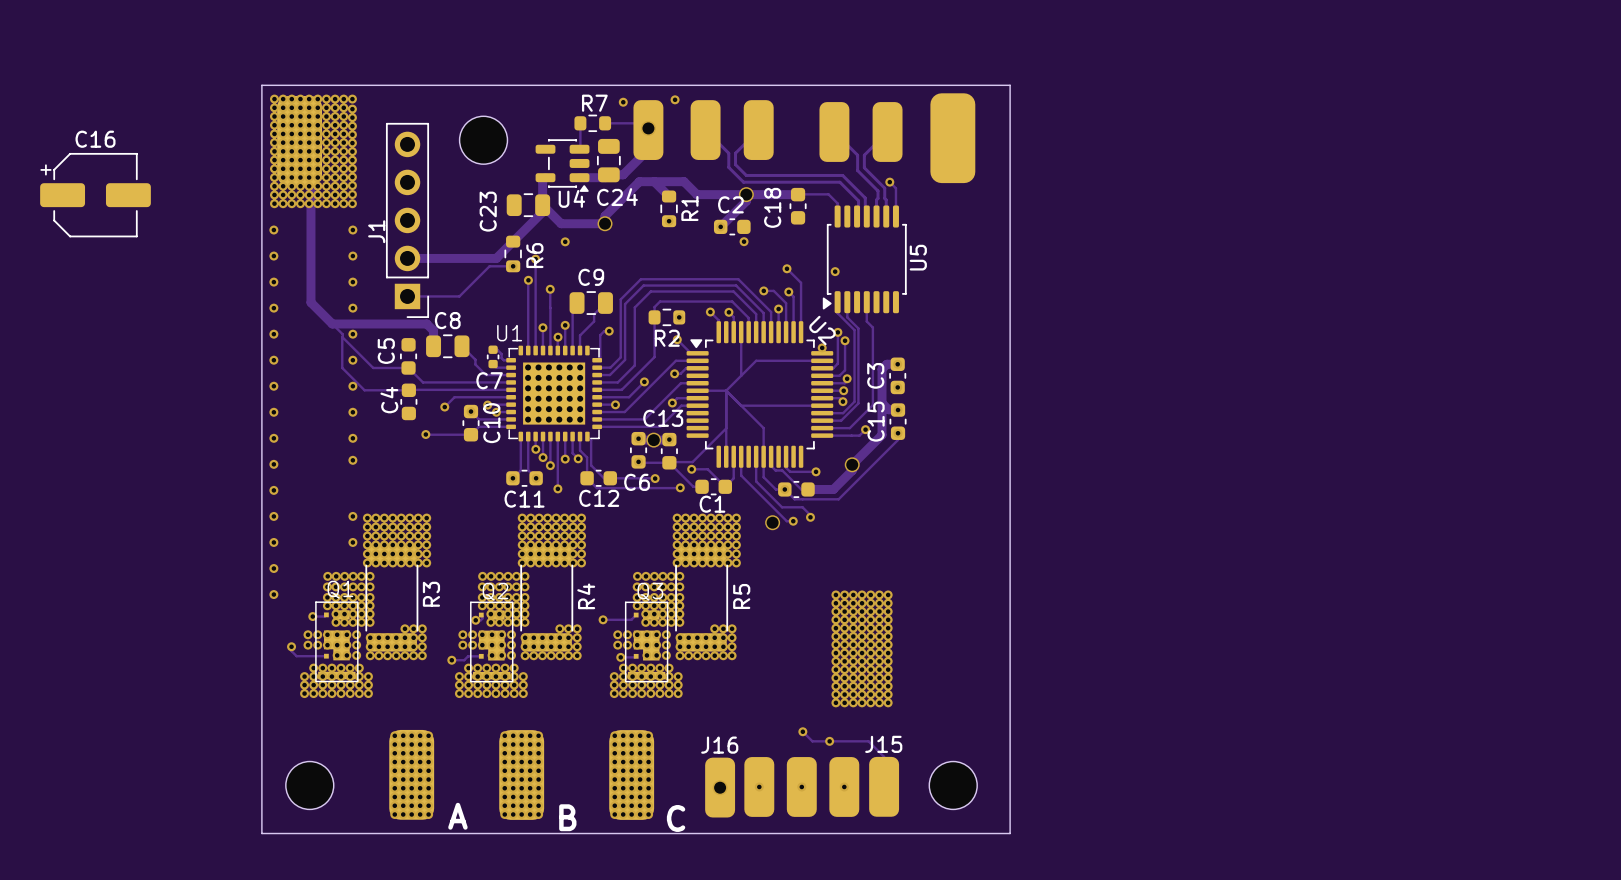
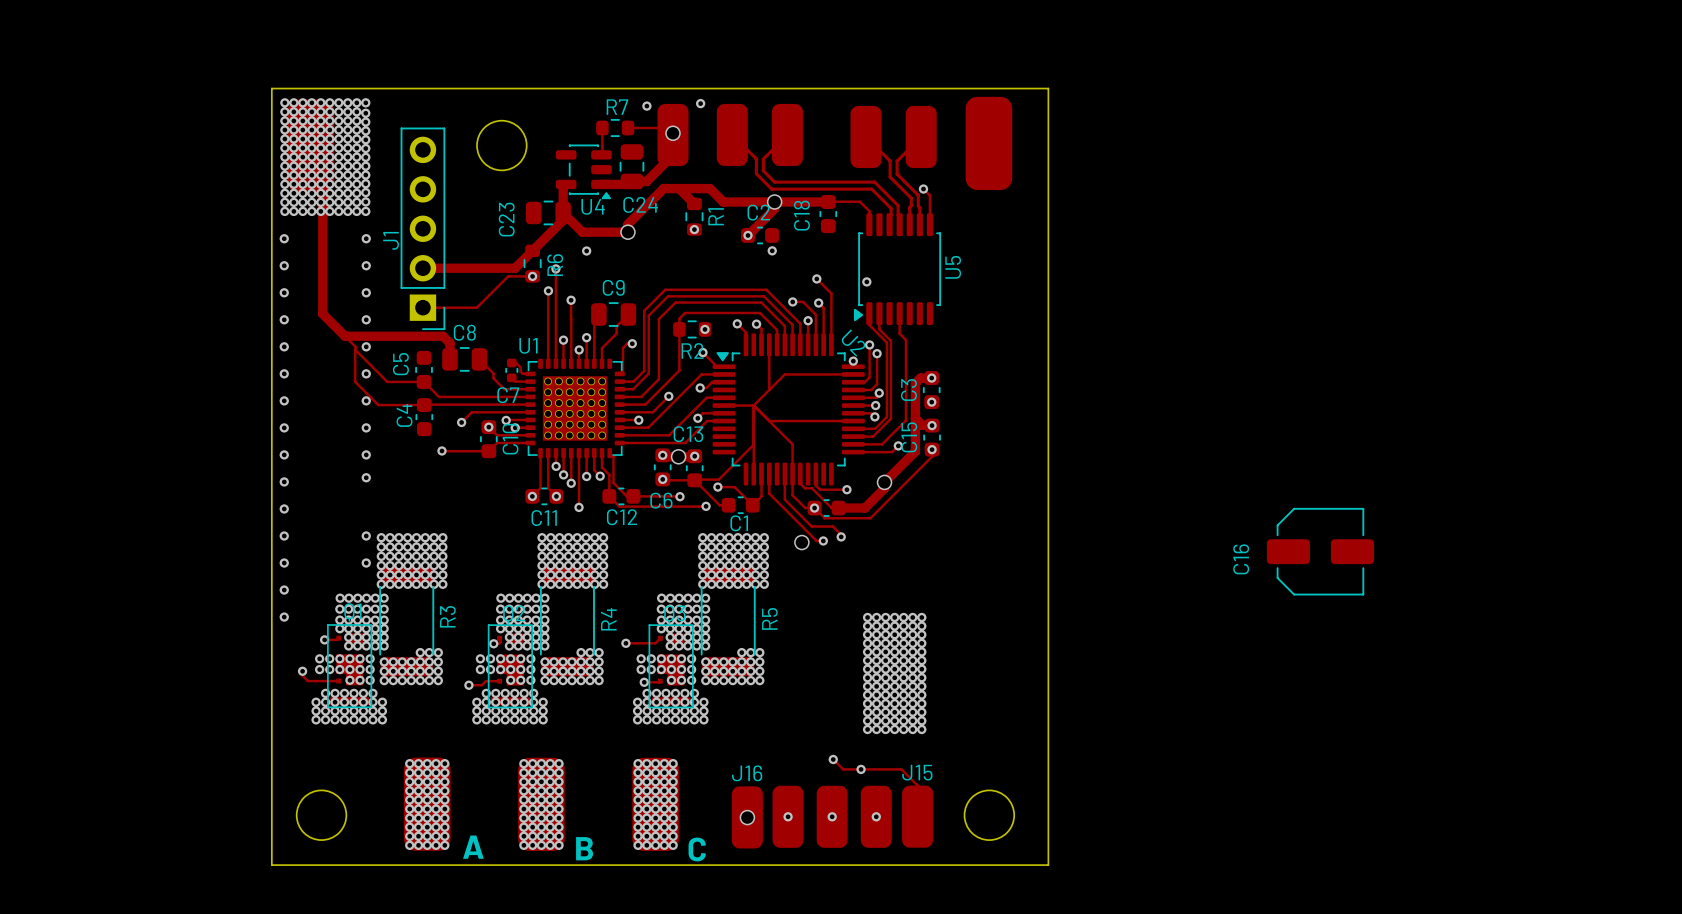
C16 name position: C16 (95, 139) -> C16 (1241, 559)
C16 footprint: [40, 152, 151, 238] -> [1266, 507, 1375, 596]

